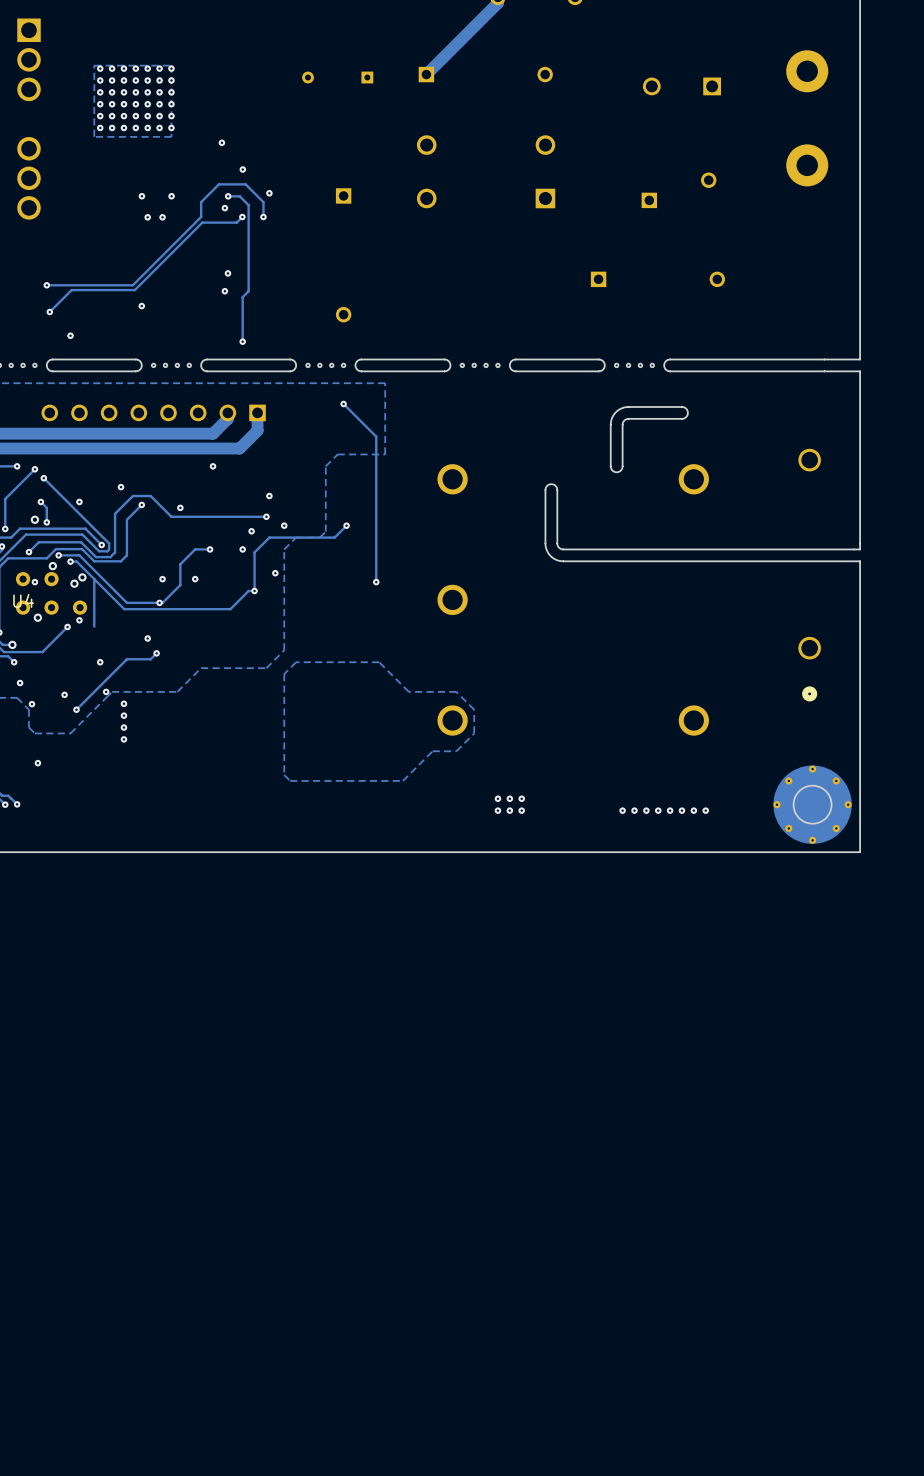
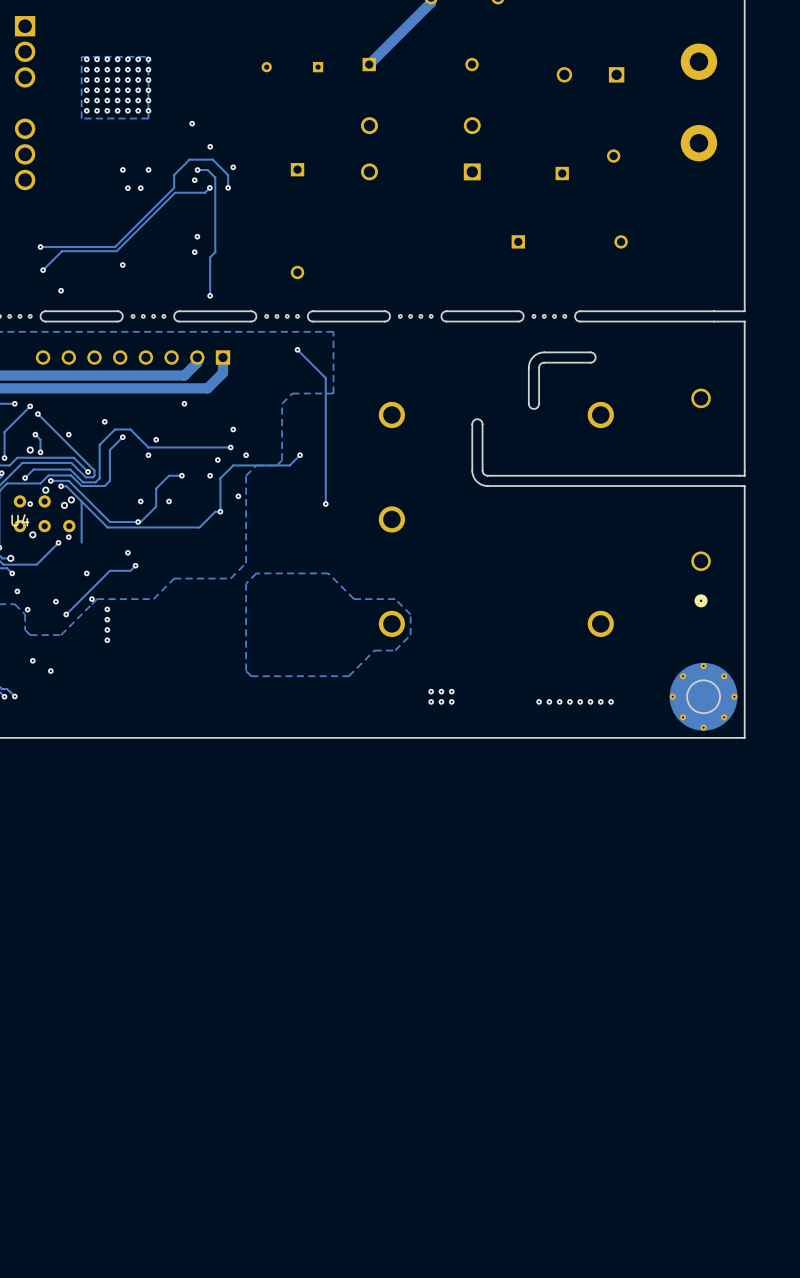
via: none -> (148, 455)
via: none -> (50, 671)

